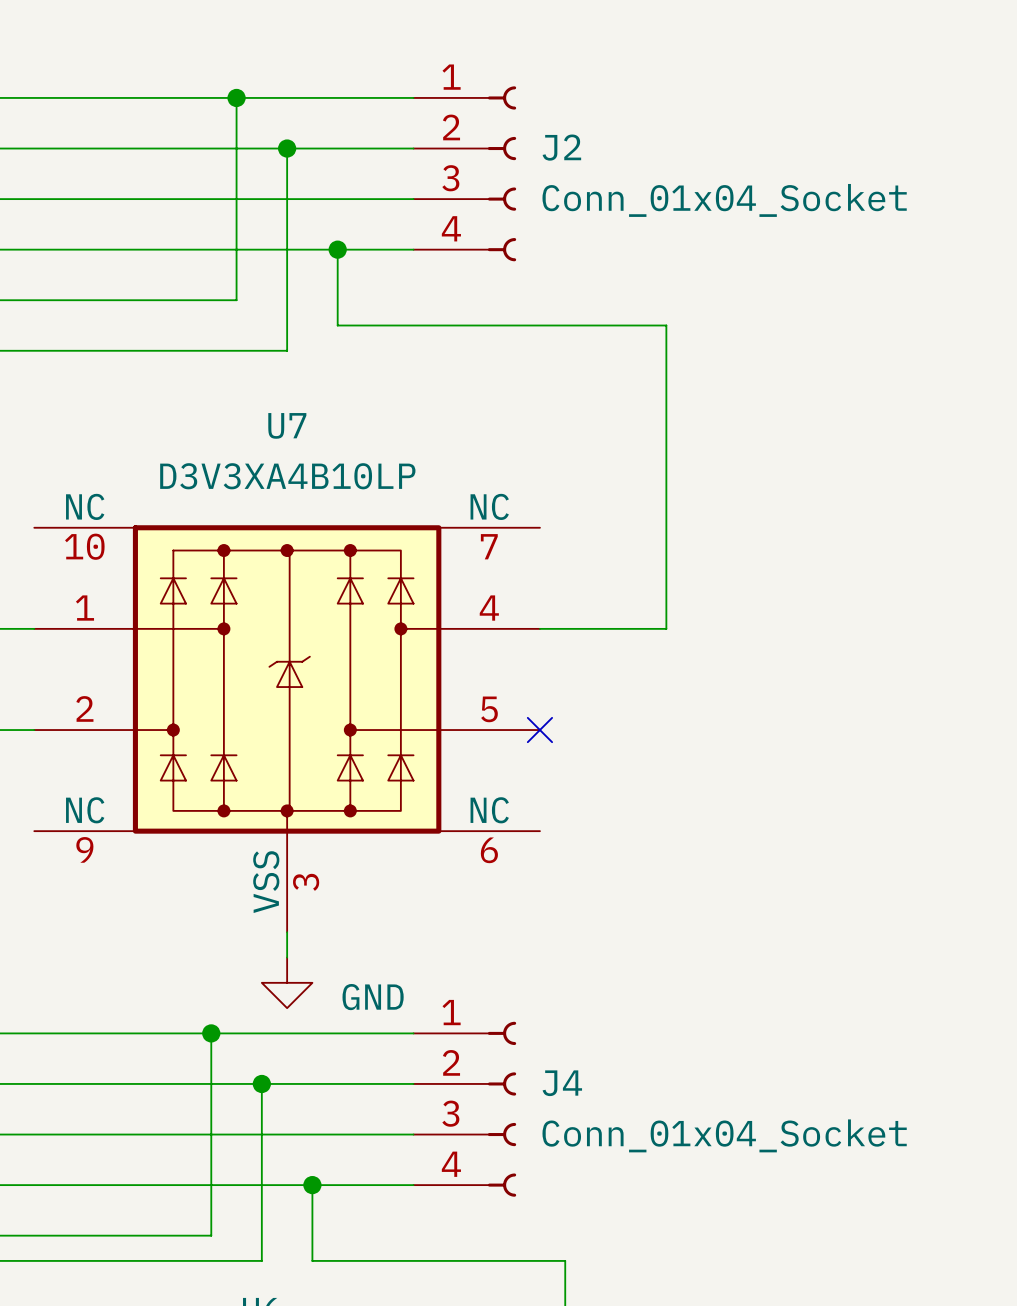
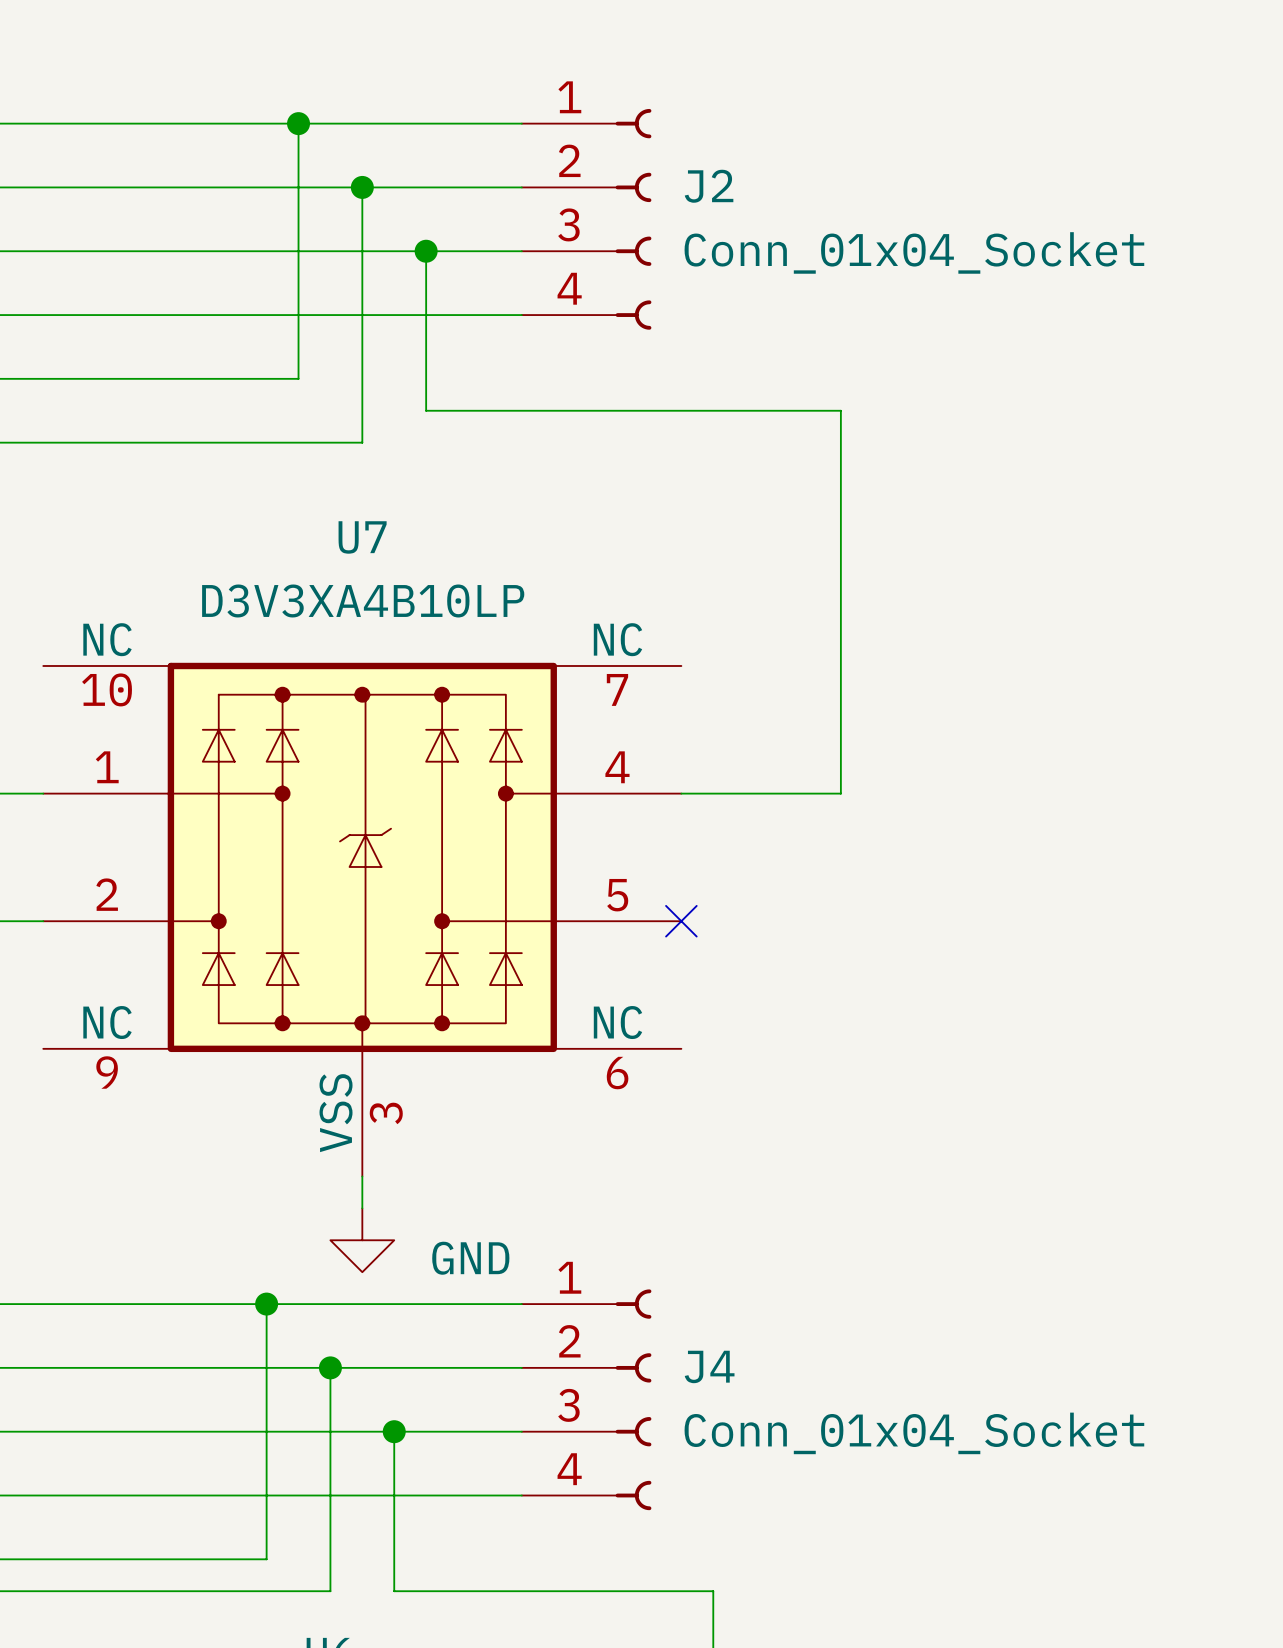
wire: none -> (426, 251) (426, 315)
junction position: (337, 249) -> (426, 251)
wire: none -> (394, 1431) (394, 1495)
junction position: (312, 1185) -> (394, 1431)

